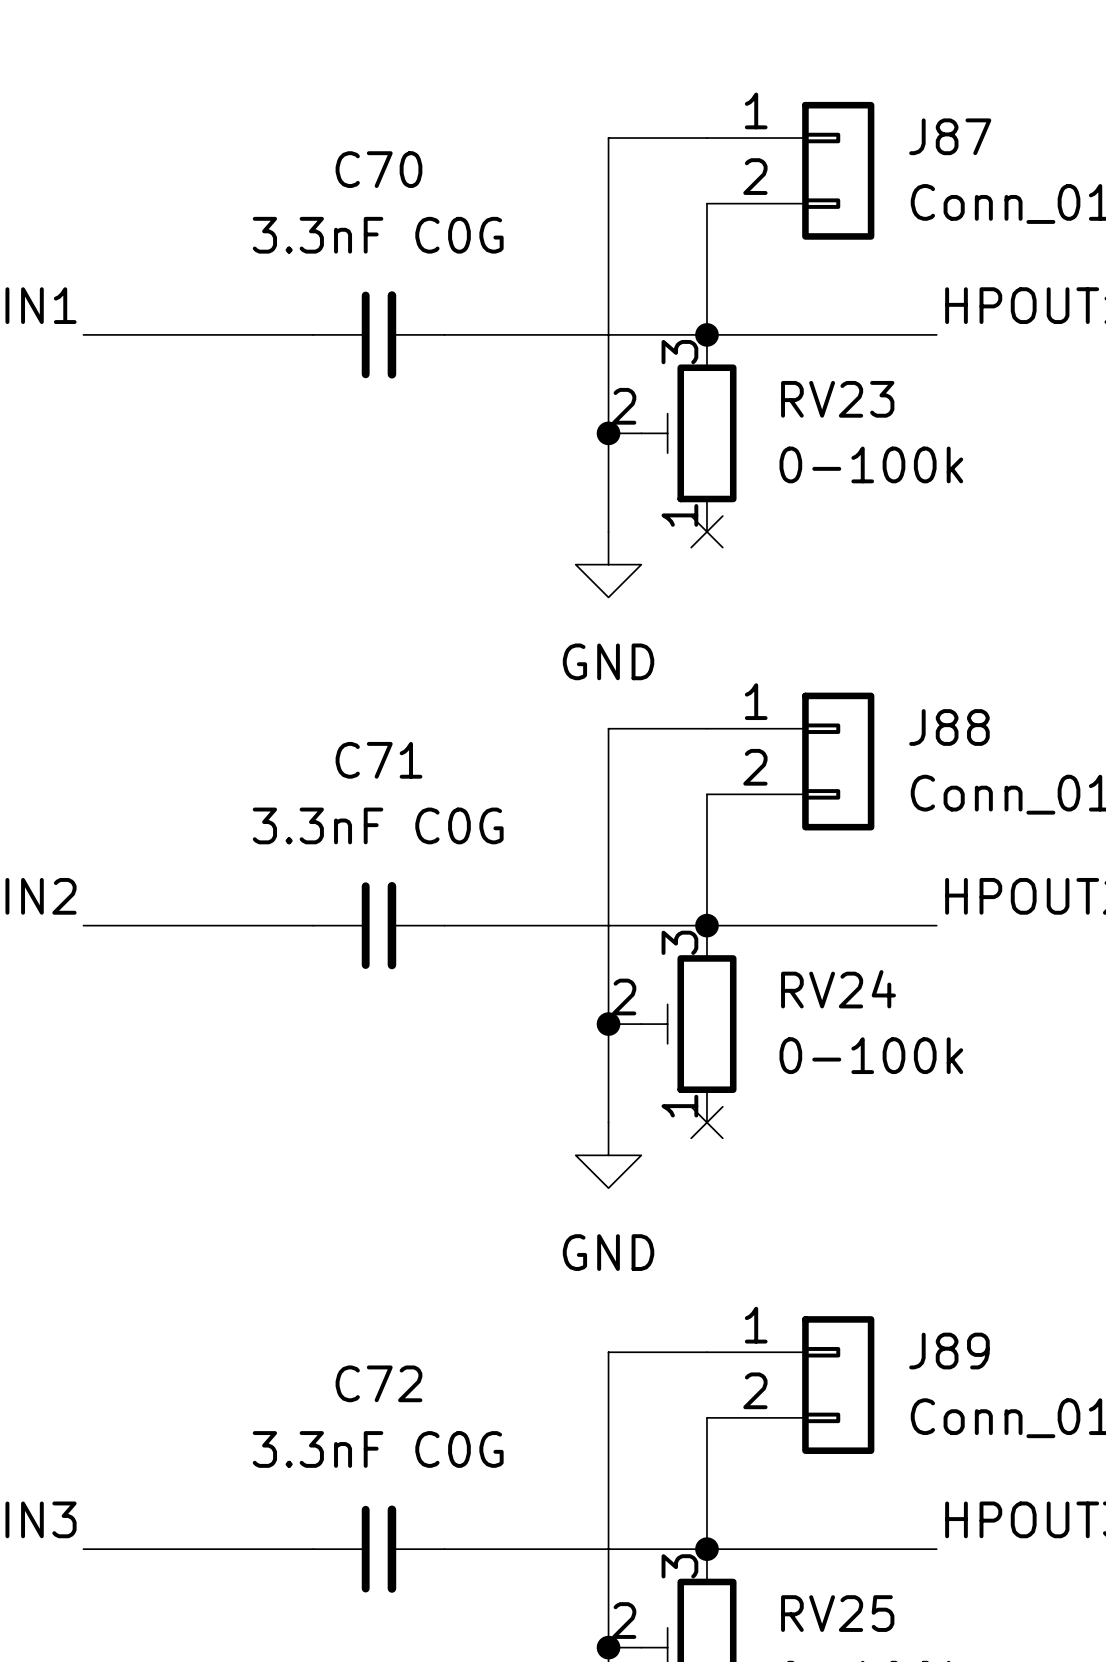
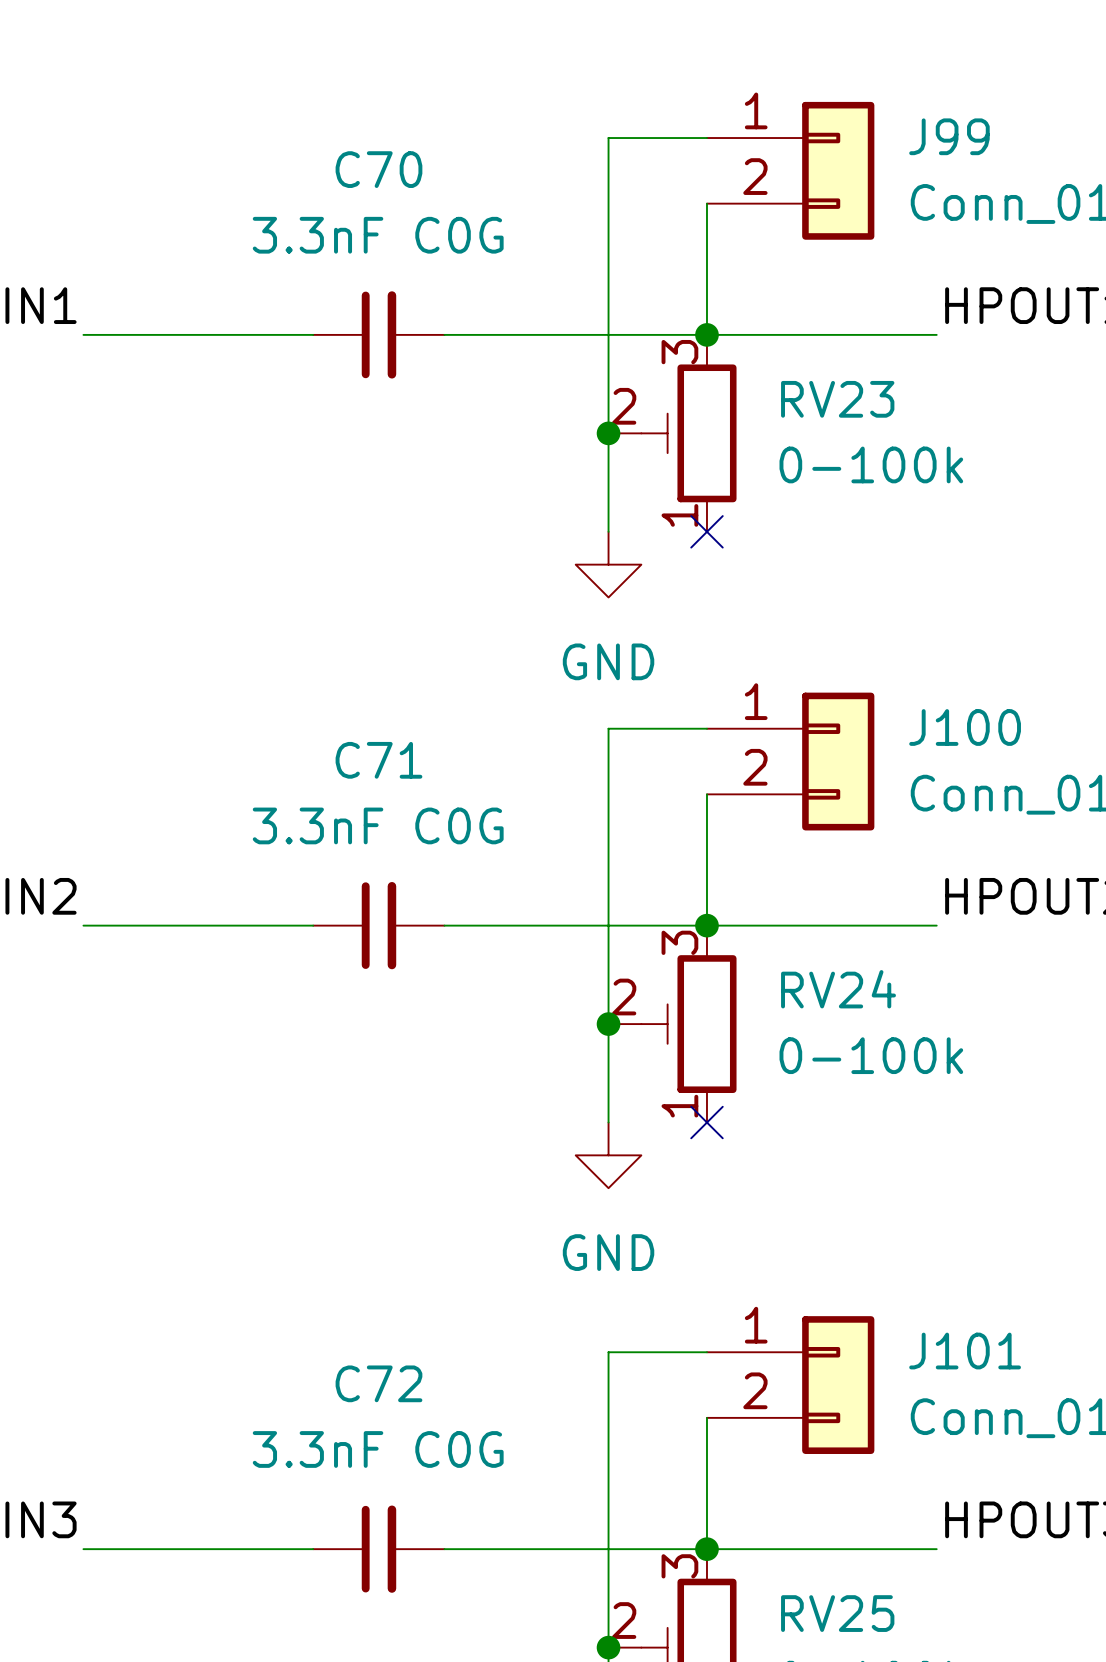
J87 name: J87 (950, 136) -> J99 (949, 136)
J88 name: J88 (949, 727) -> J100 (965, 727)
J89 name: J89 (949, 1351) -> J101 (965, 1351)

